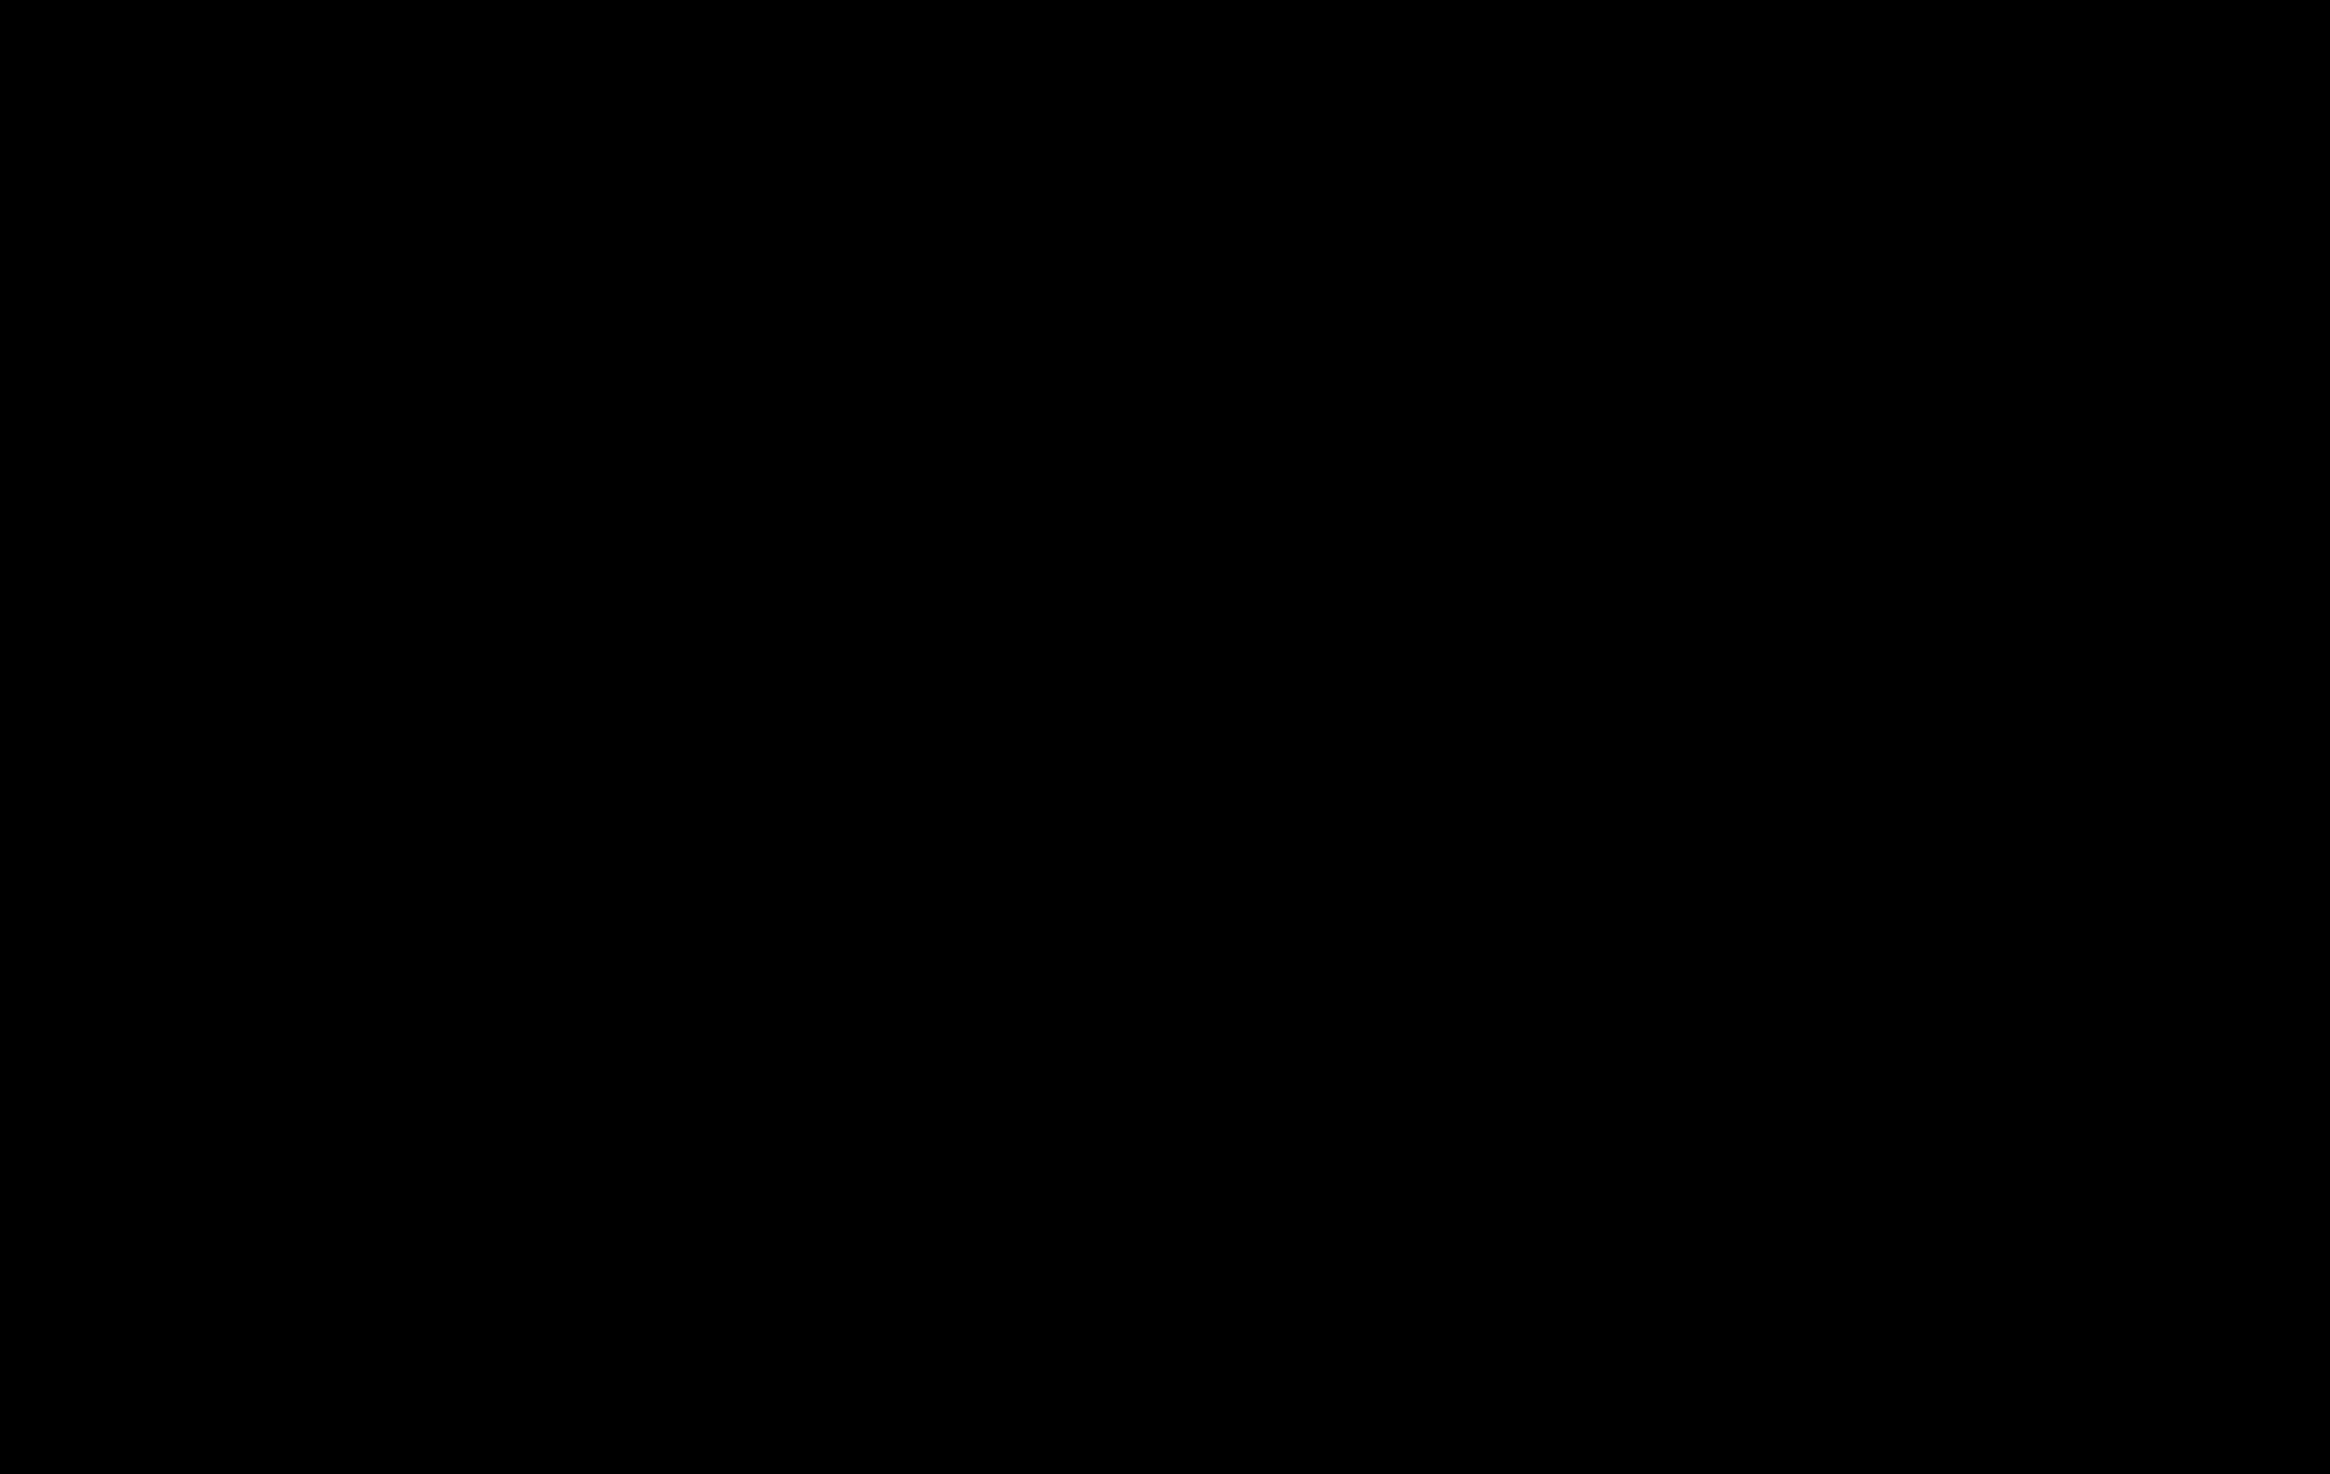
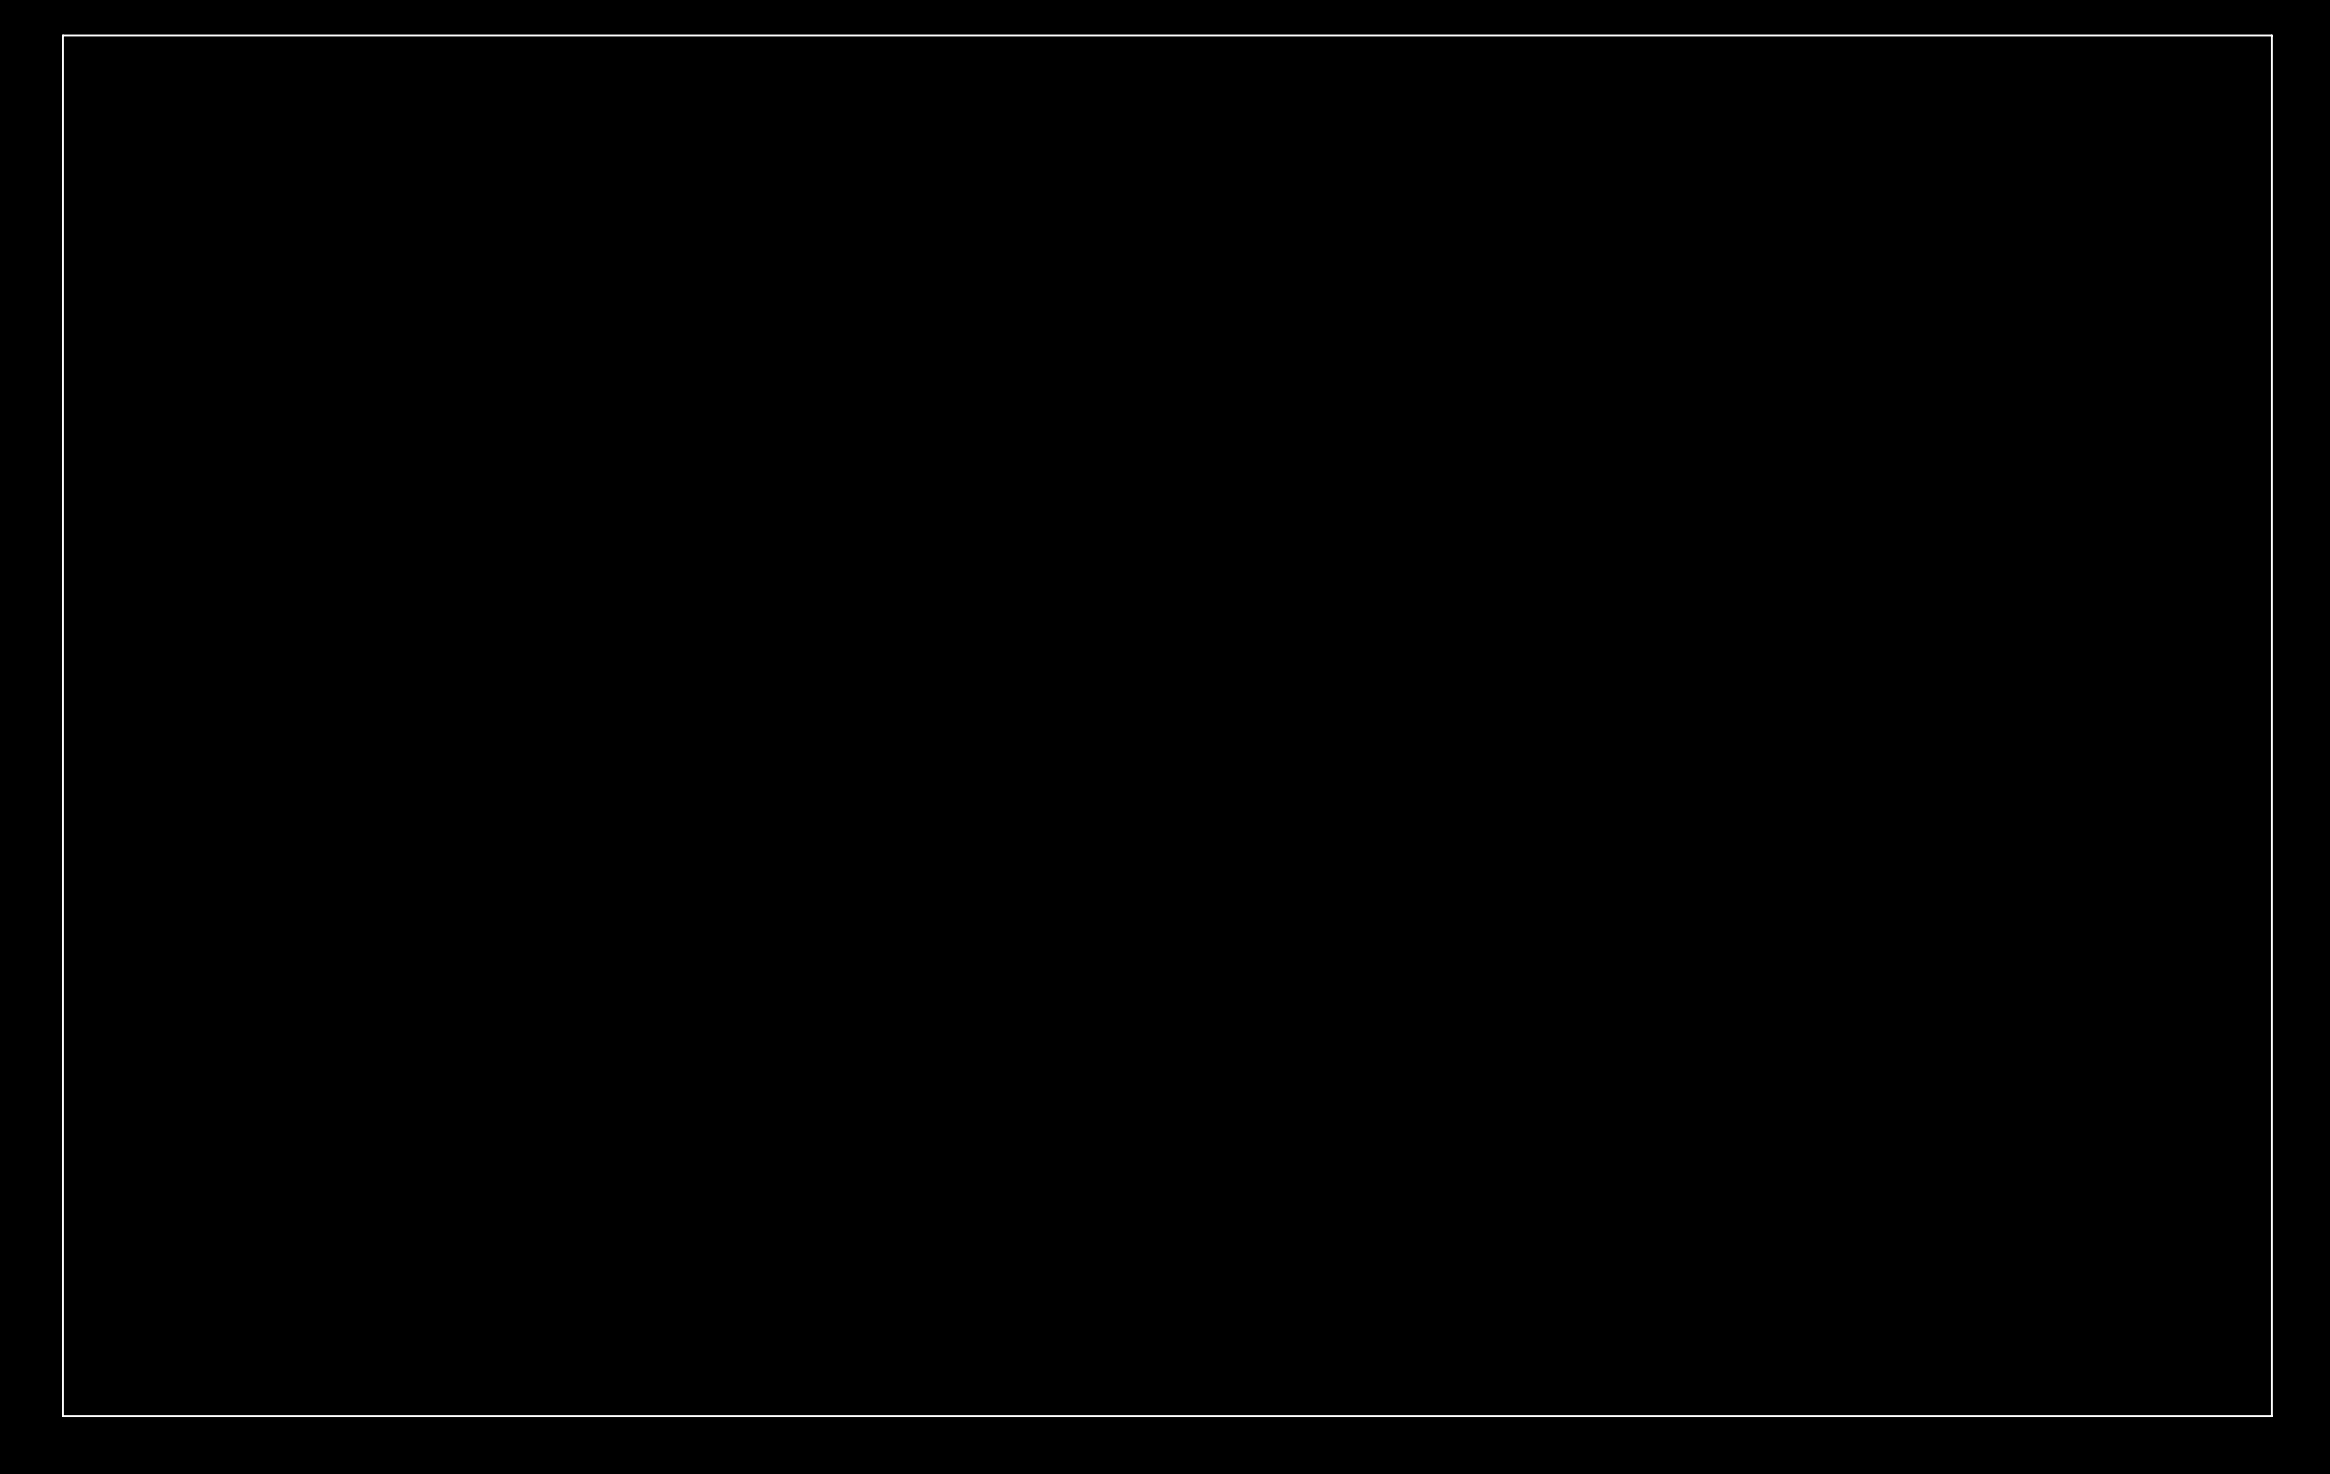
board edge: none -> (62, 35) (2271, 35) (2271, 1416) (62, 1416) (62, 35)

